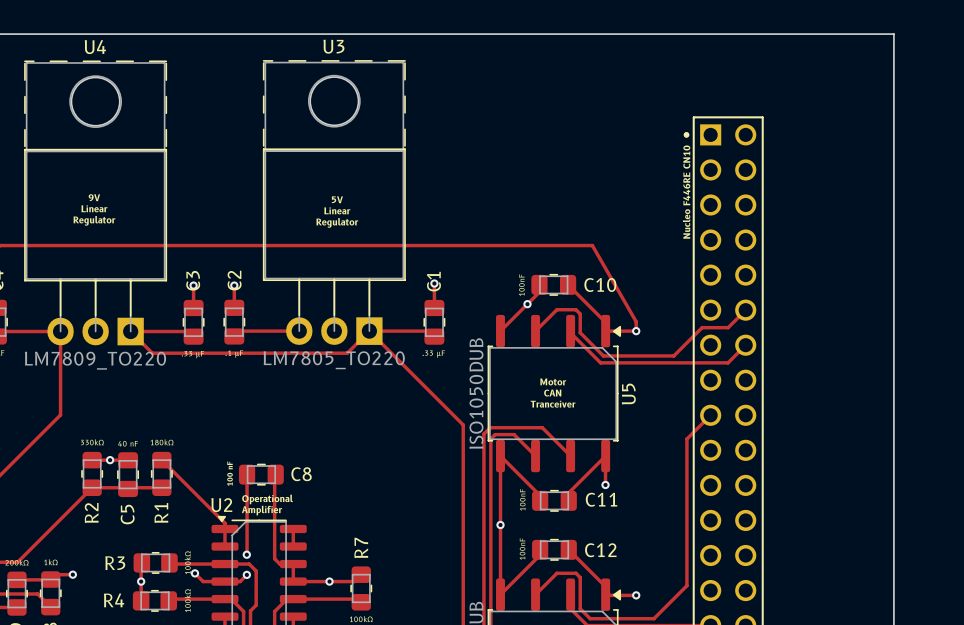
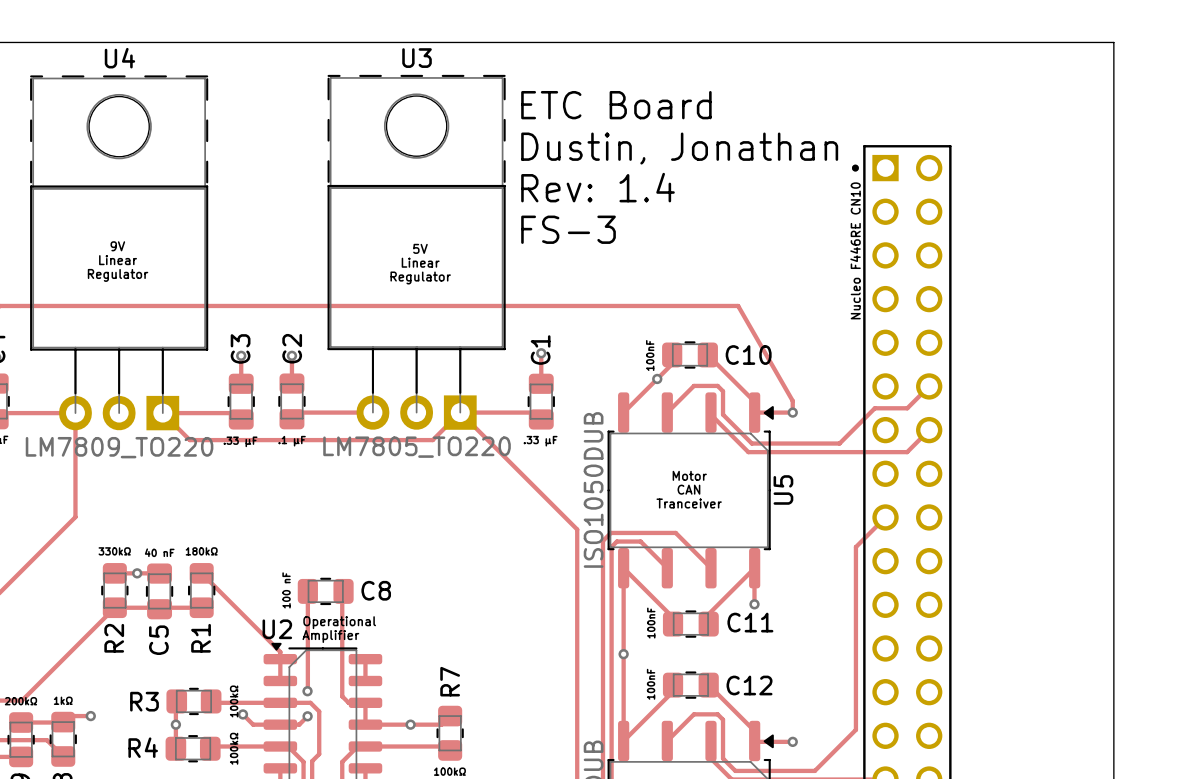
text: none -> ETC Board (616, 105)
text: none -> Dustin, Jonathan (679, 148)
text: none -> Rev: 1.4 (598, 187)
text: none -> FS-3 (568, 229)

